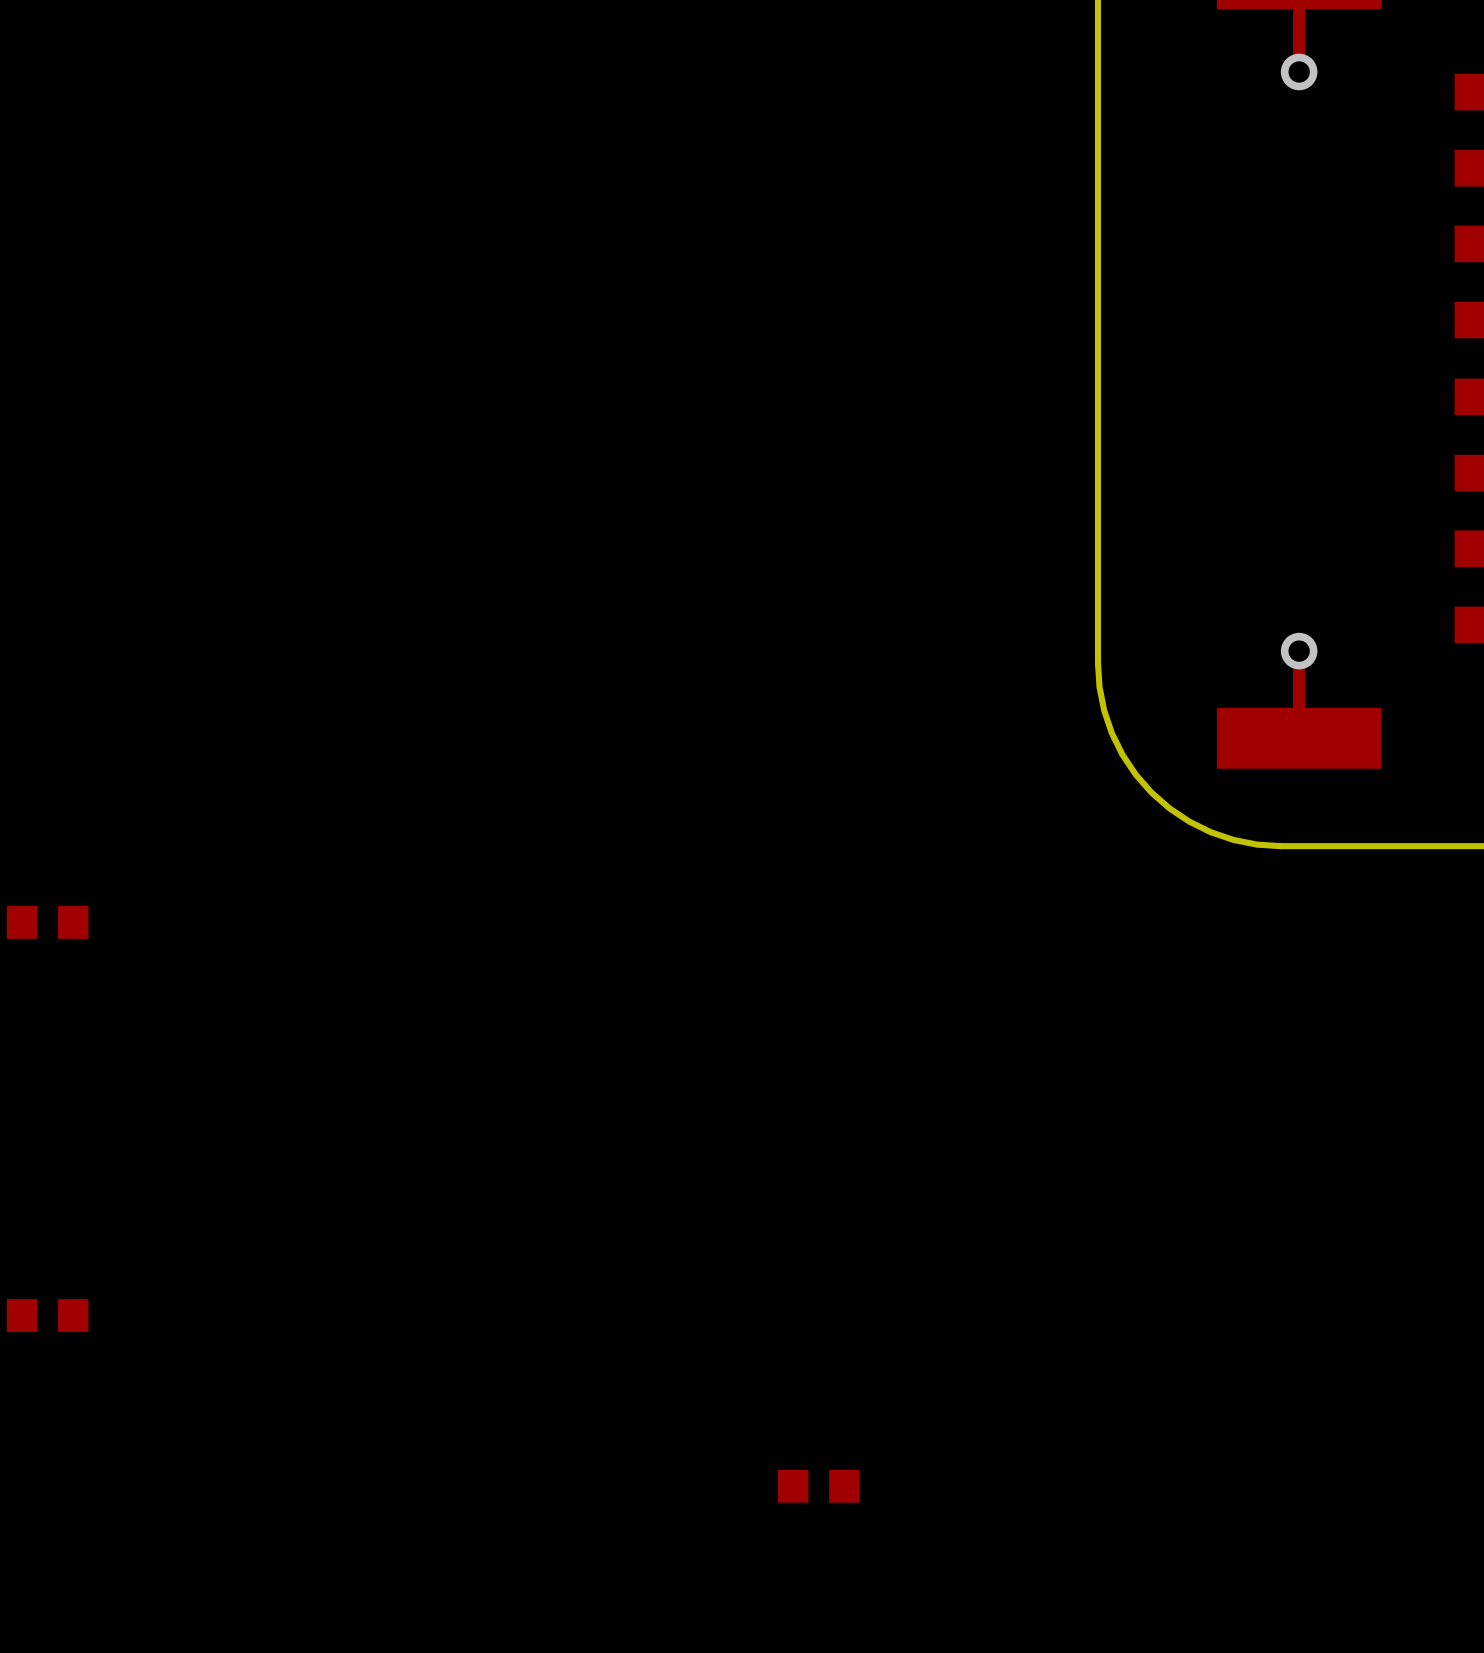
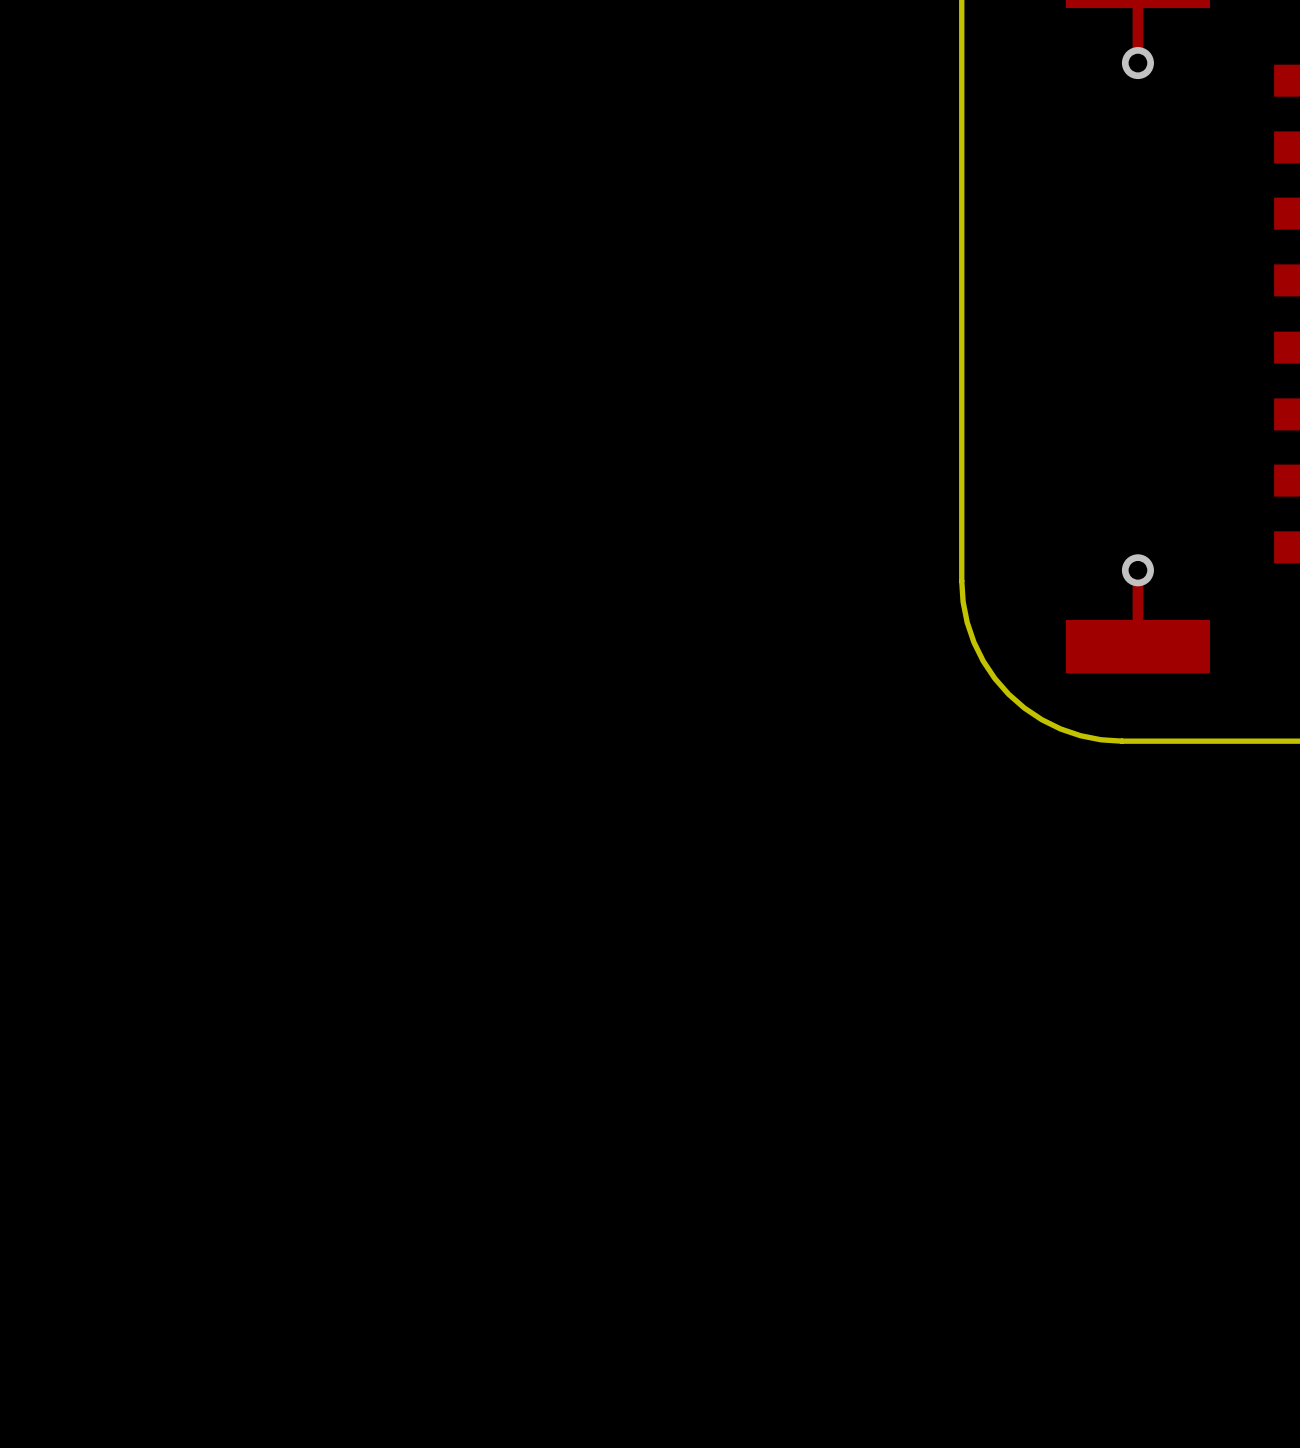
part: (47, 922) -> none
part: (47, 1315) -> none
part: (818, 1486) -> none

